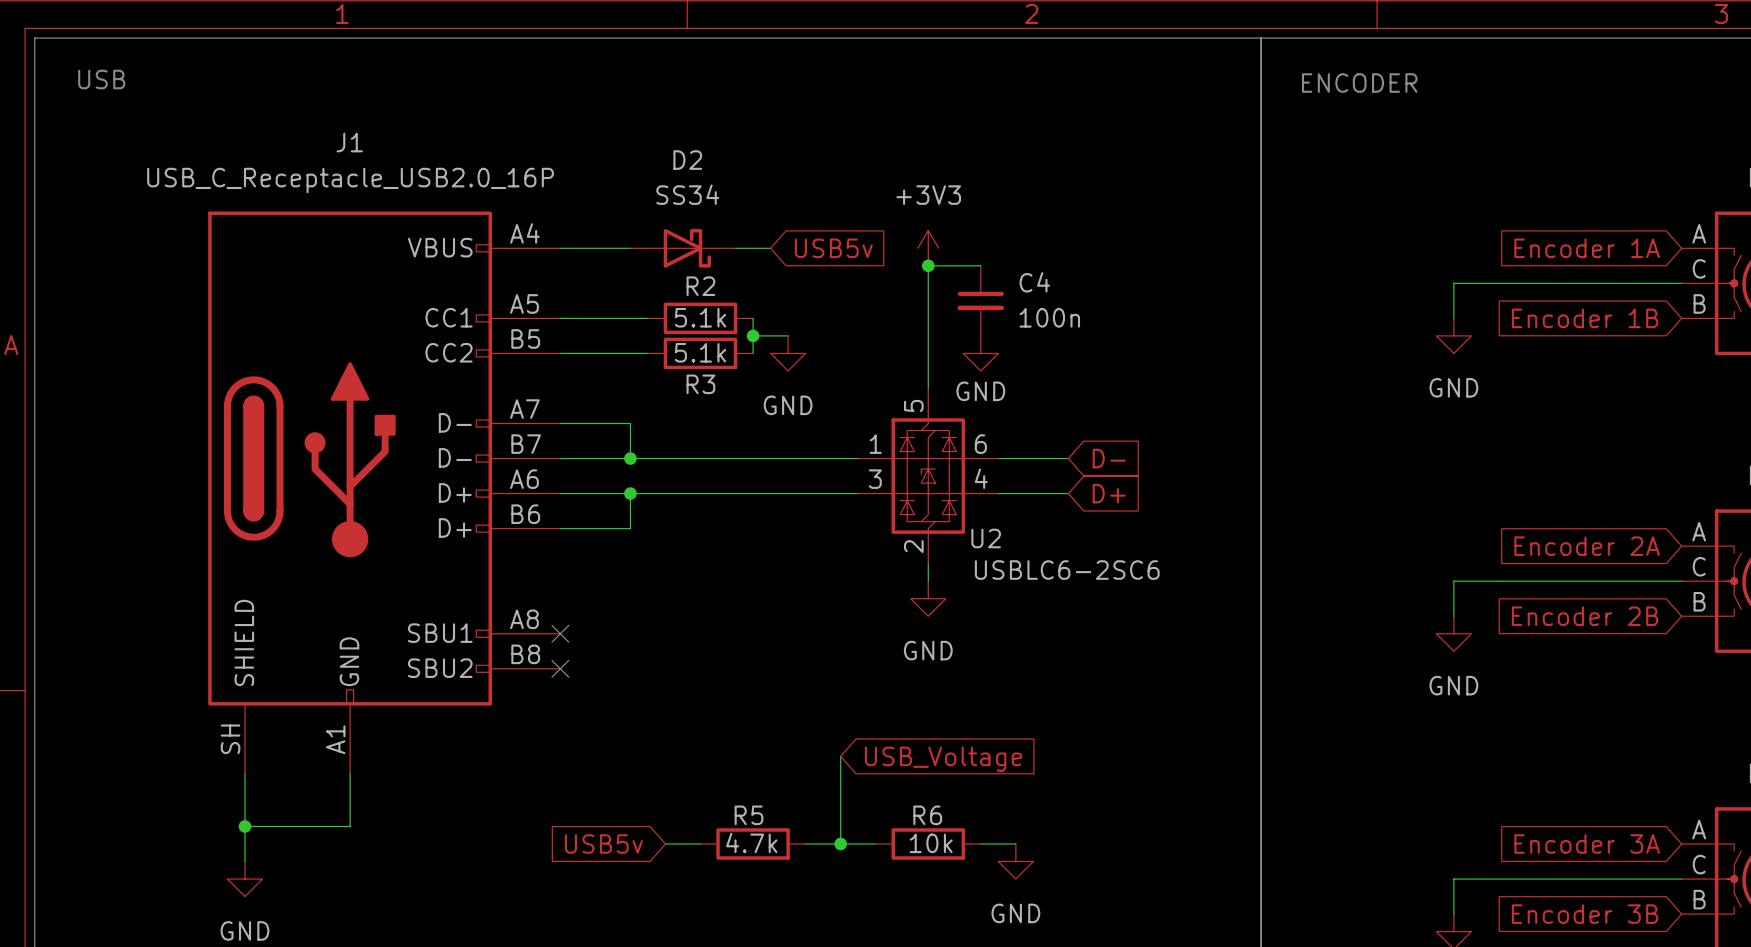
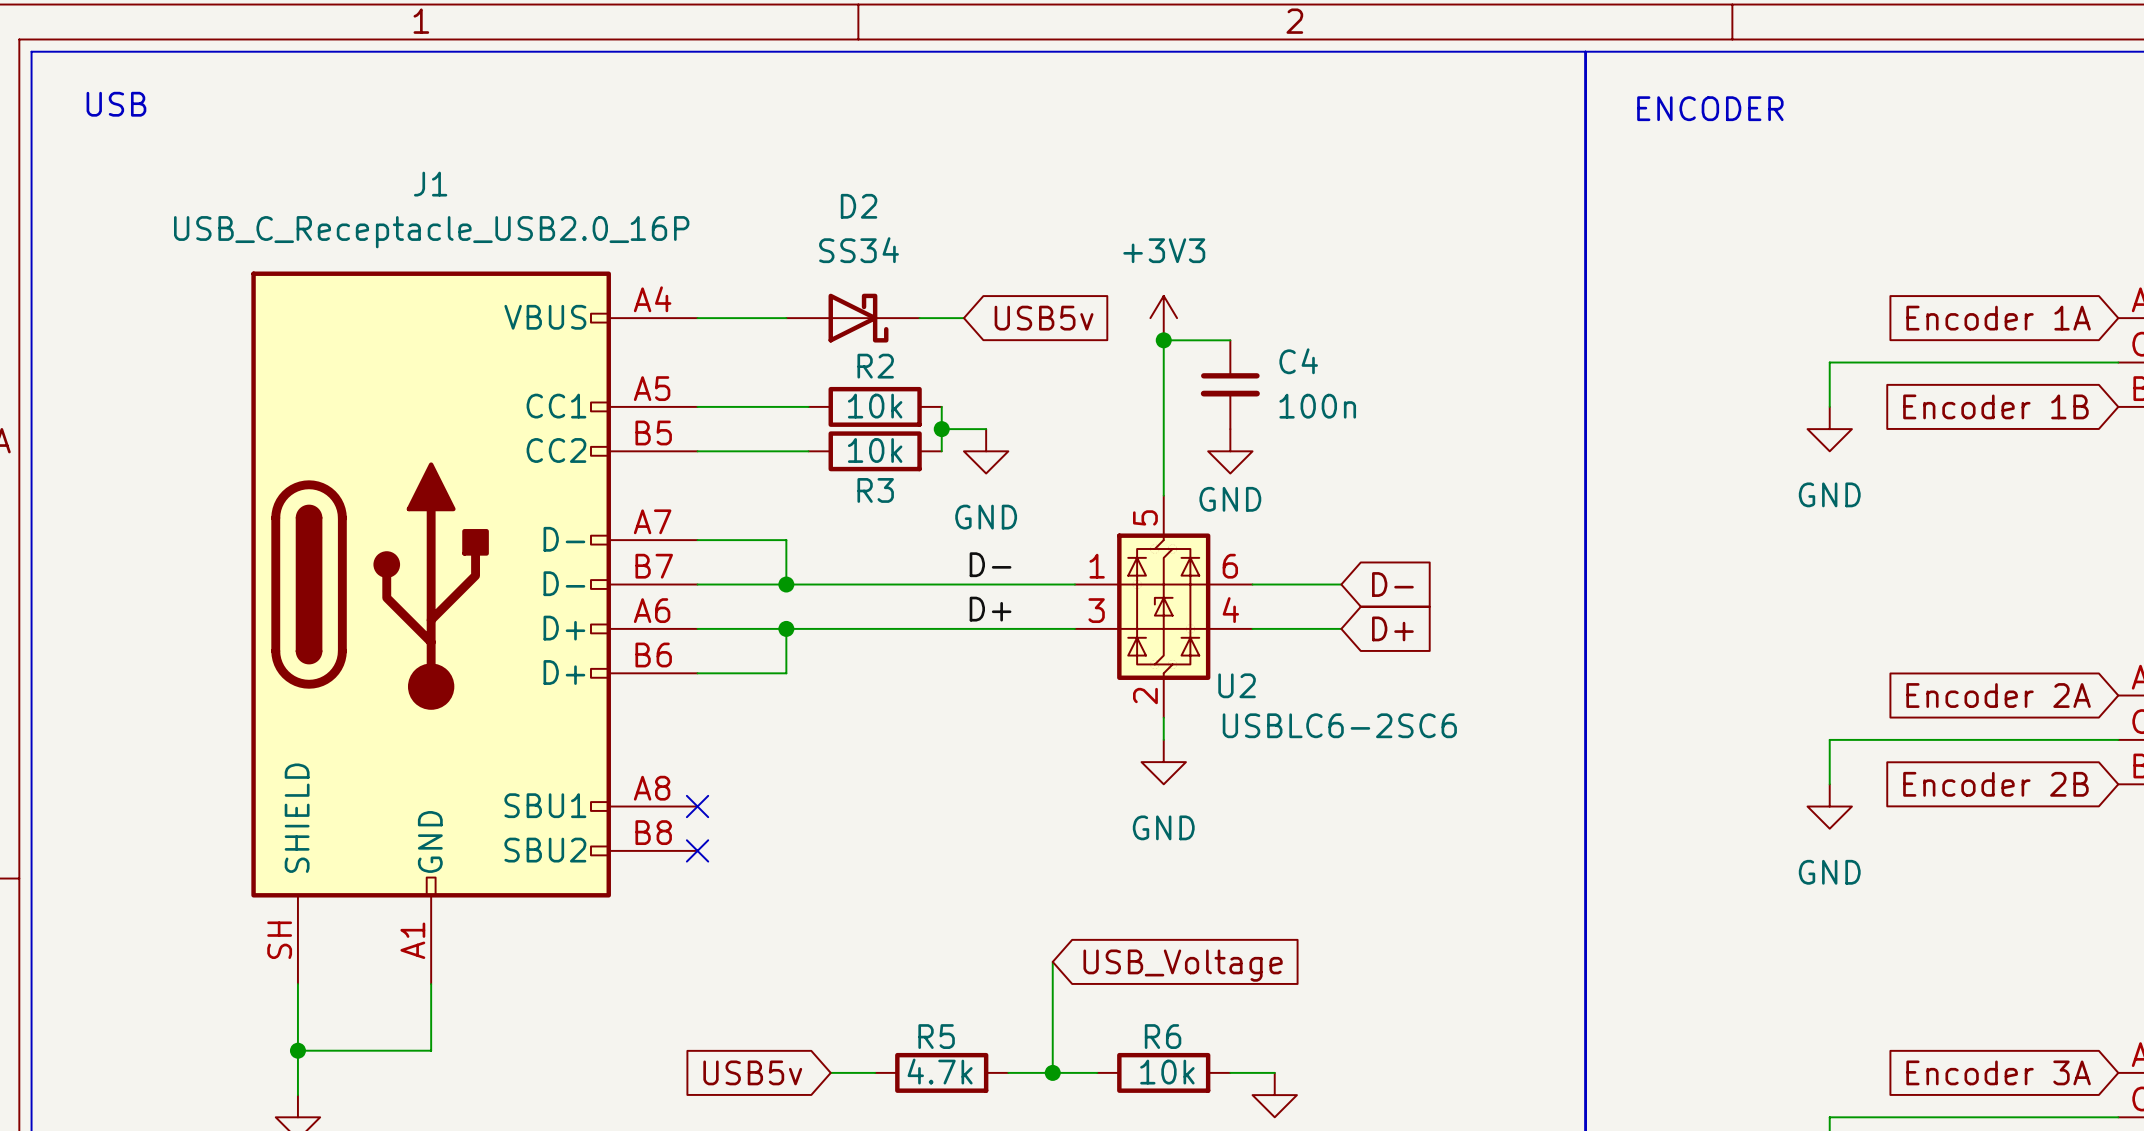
R2 value: 5.1k (700, 317) -> 10k (875, 406)
R3 value: 5.1k (700, 352) -> 10k (875, 450)
label: none -> D- (990, 564)
label: none -> D+ (990, 609)

